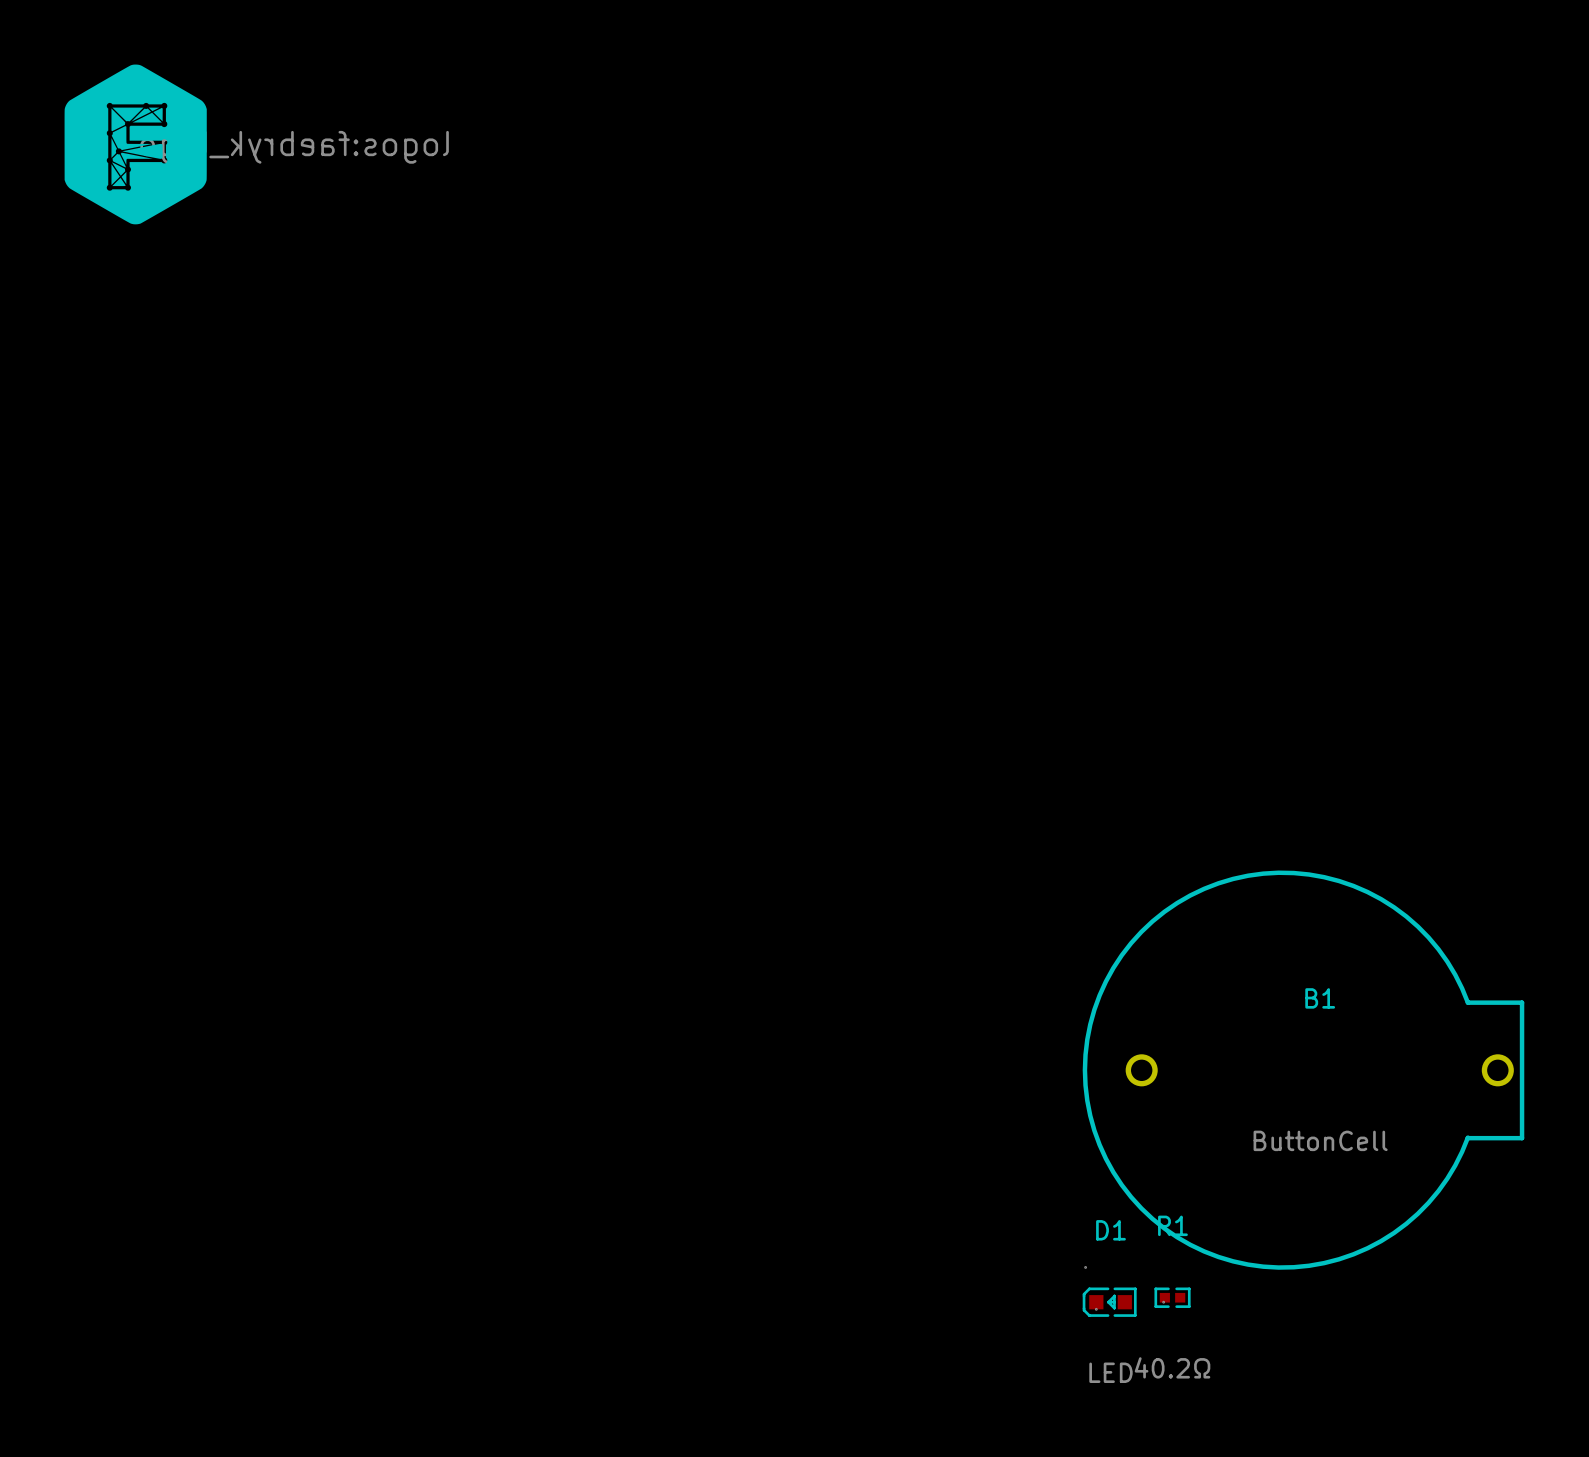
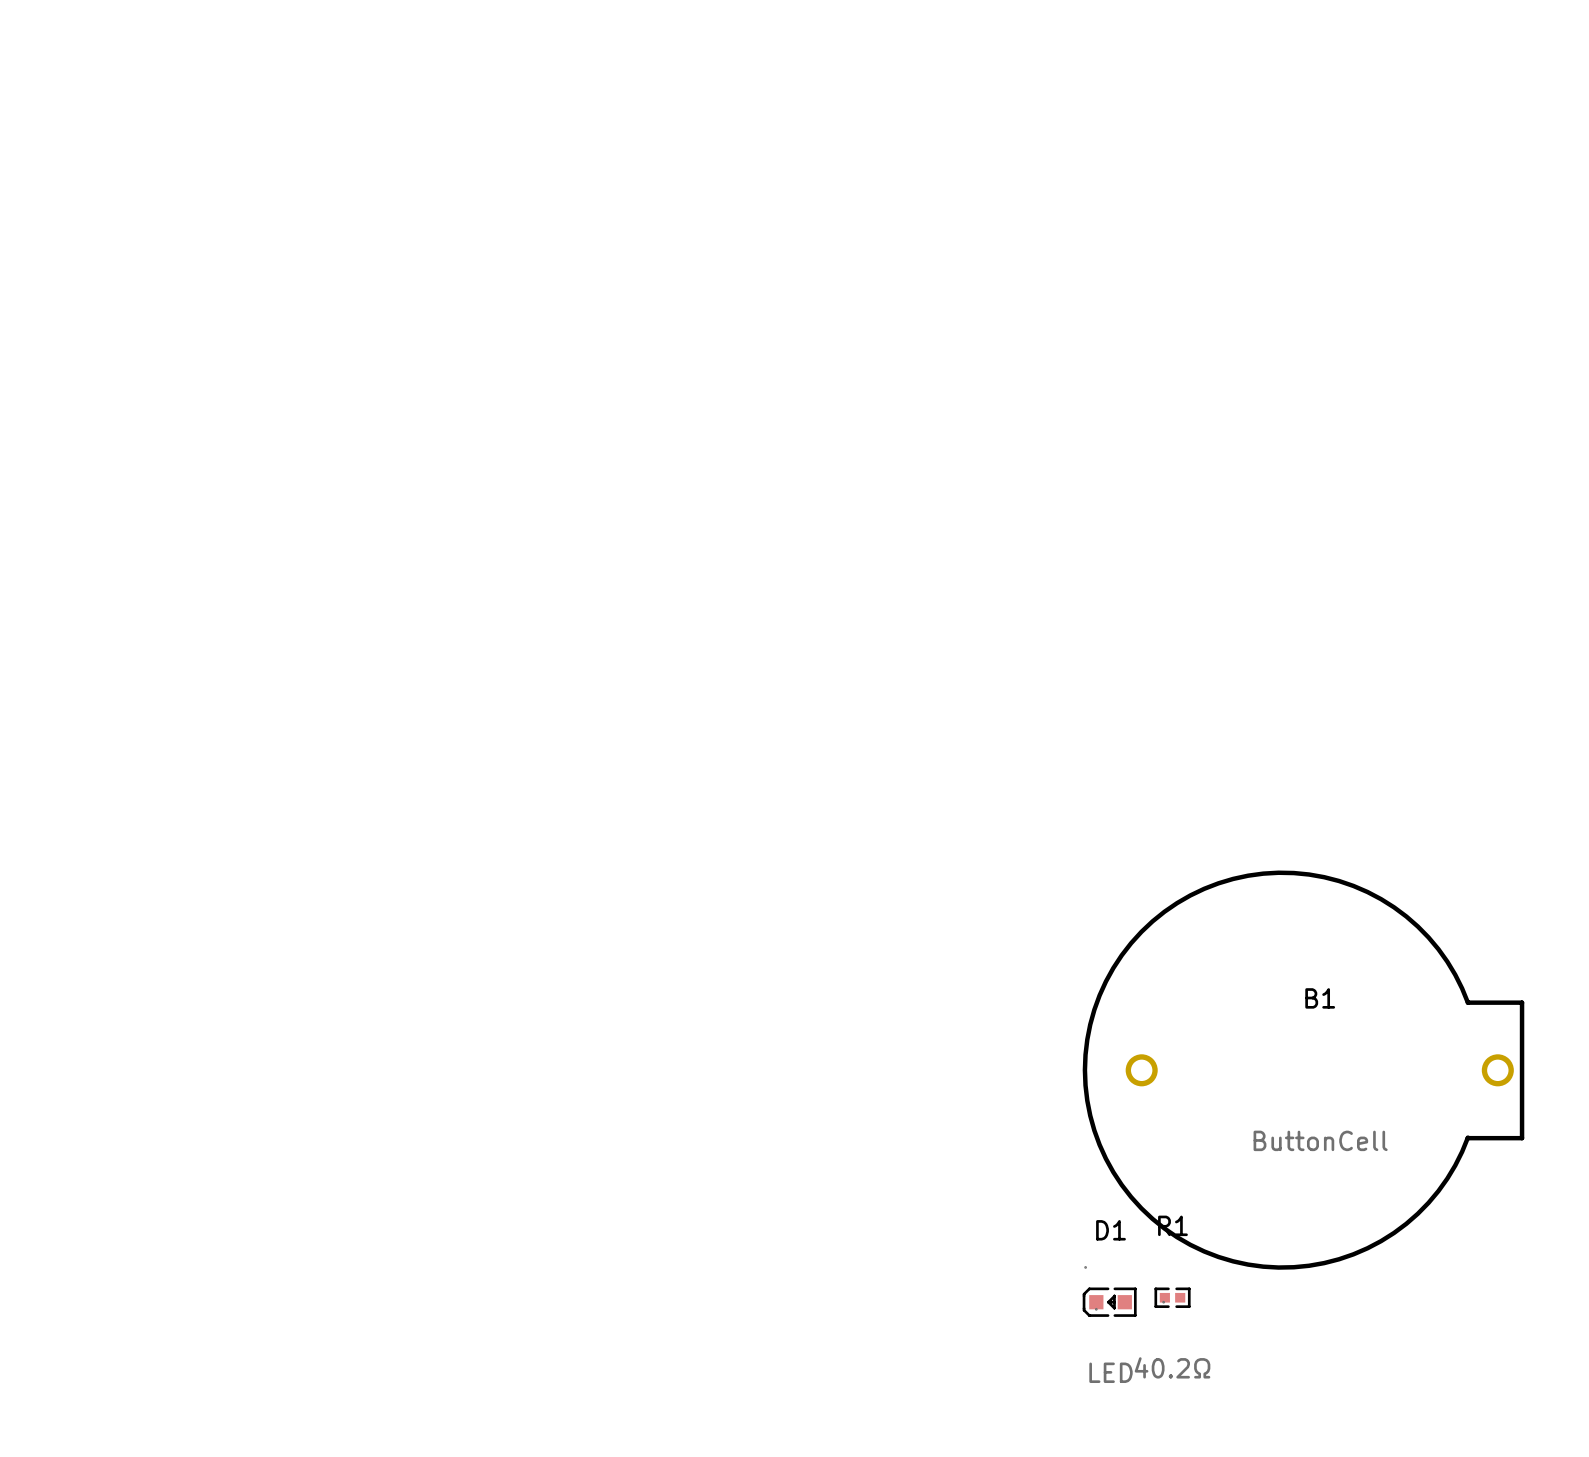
drawing: [64, 64, 207, 225] -> none

